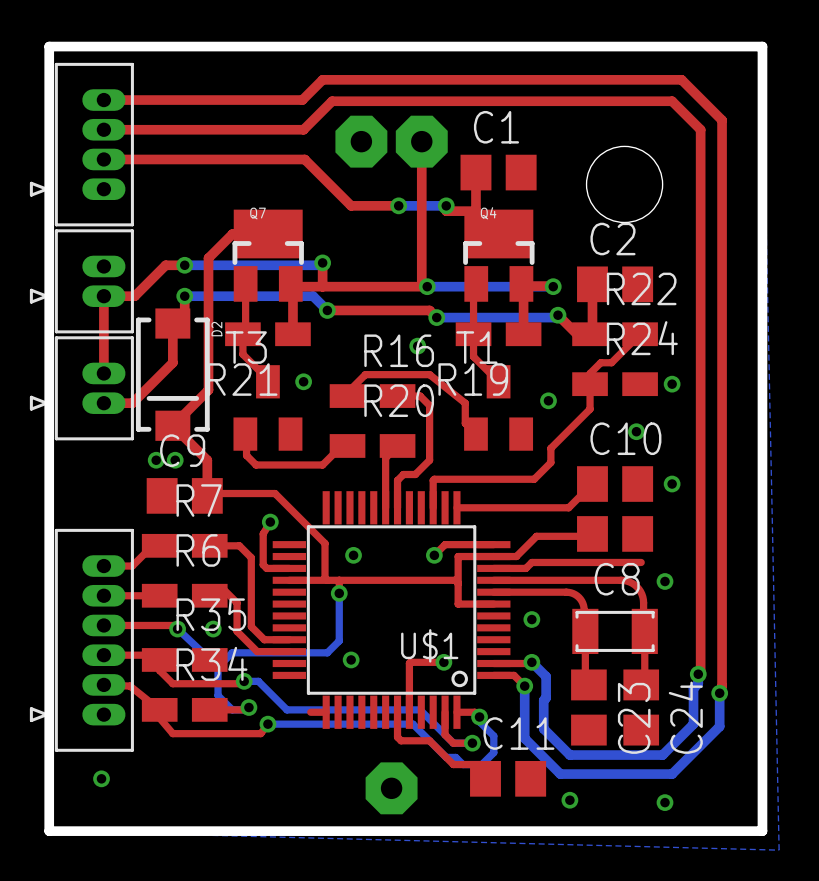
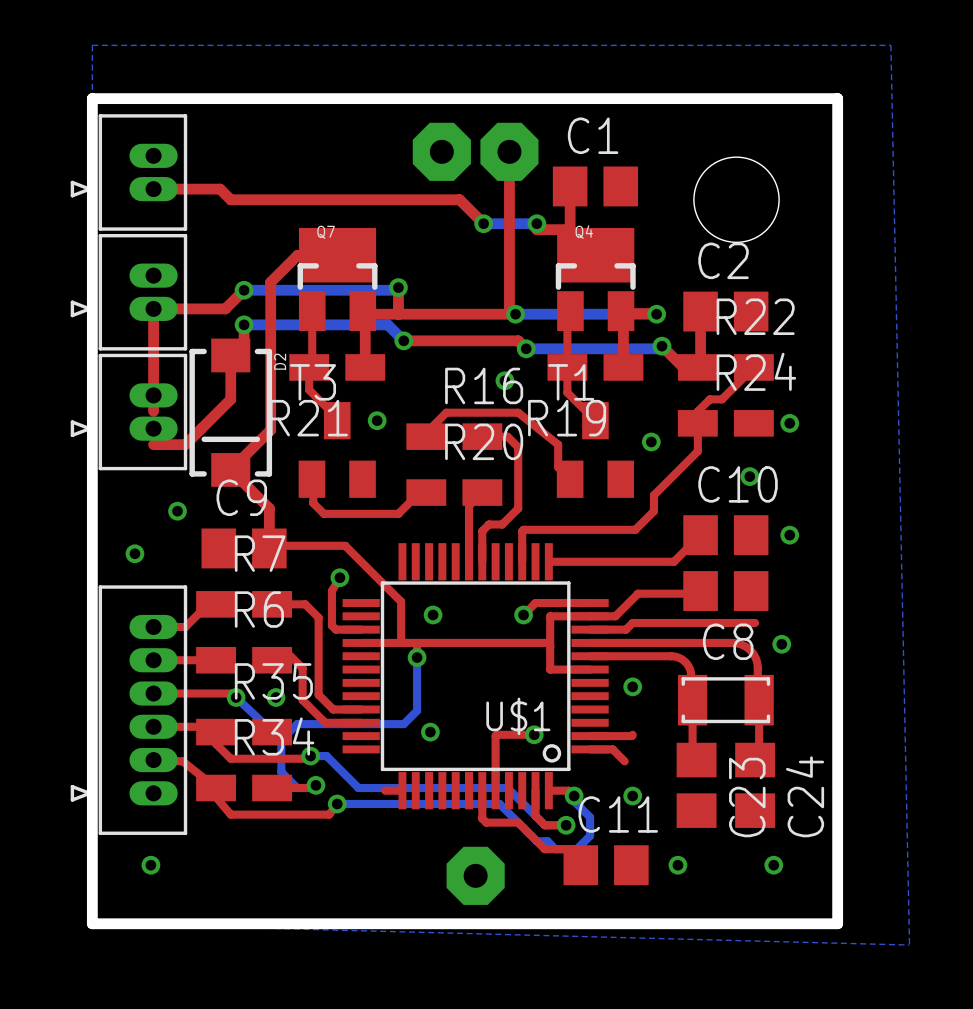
part footprint: [29, 62, 134, 227] -> [70, 114, 188, 231]
board edge: (49, 94) (49, 46) (762, 46) (762, 831) (714, 831) -> (92, 98) (837, 98) (837, 923)
top track: (103, 100) (302, 100) (322, 79) (681, 79) (722, 120) (722, 686) (719, 693) -> none
top track: (103, 129) (303, 129) (332, 101) (672, 101) (700, 129) (700, 671) (698, 674) -> none
top track: (103, 159) (304, 159) (351, 205) (398, 205) -> (153, 189) (220, 189) (230, 199) (459, 199) (483, 223)
top track: (184, 265) (165, 265) (134, 296) (103, 296) -> (244, 290) (225, 308) (153, 308) (153, 324)
part position: (81, 281) -> (128, 292)
part position: (81, 388) -> (128, 412)
via: (156, 460) -> none
via: (175, 460) -> none
via: none -> (177, 511)
via: none -> (134, 553)
bottom track: (531, 662) (546, 676) (543, 728) (569, 755) (662, 755) (693, 724) (693, 688) (698, 683) (698, 674) -> none
via: (531, 662) -> none
via: (698, 674) -> none
bottom track: (524, 686) (524, 738) (560, 774) (672, 774) (719, 726) (719, 693) -> none
via: (524, 686) -> none
via: (719, 693) -> none
via: none -> (632, 796)
via position: (569, 800) -> (677, 865)
via position: (664, 802) -> (773, 865)

